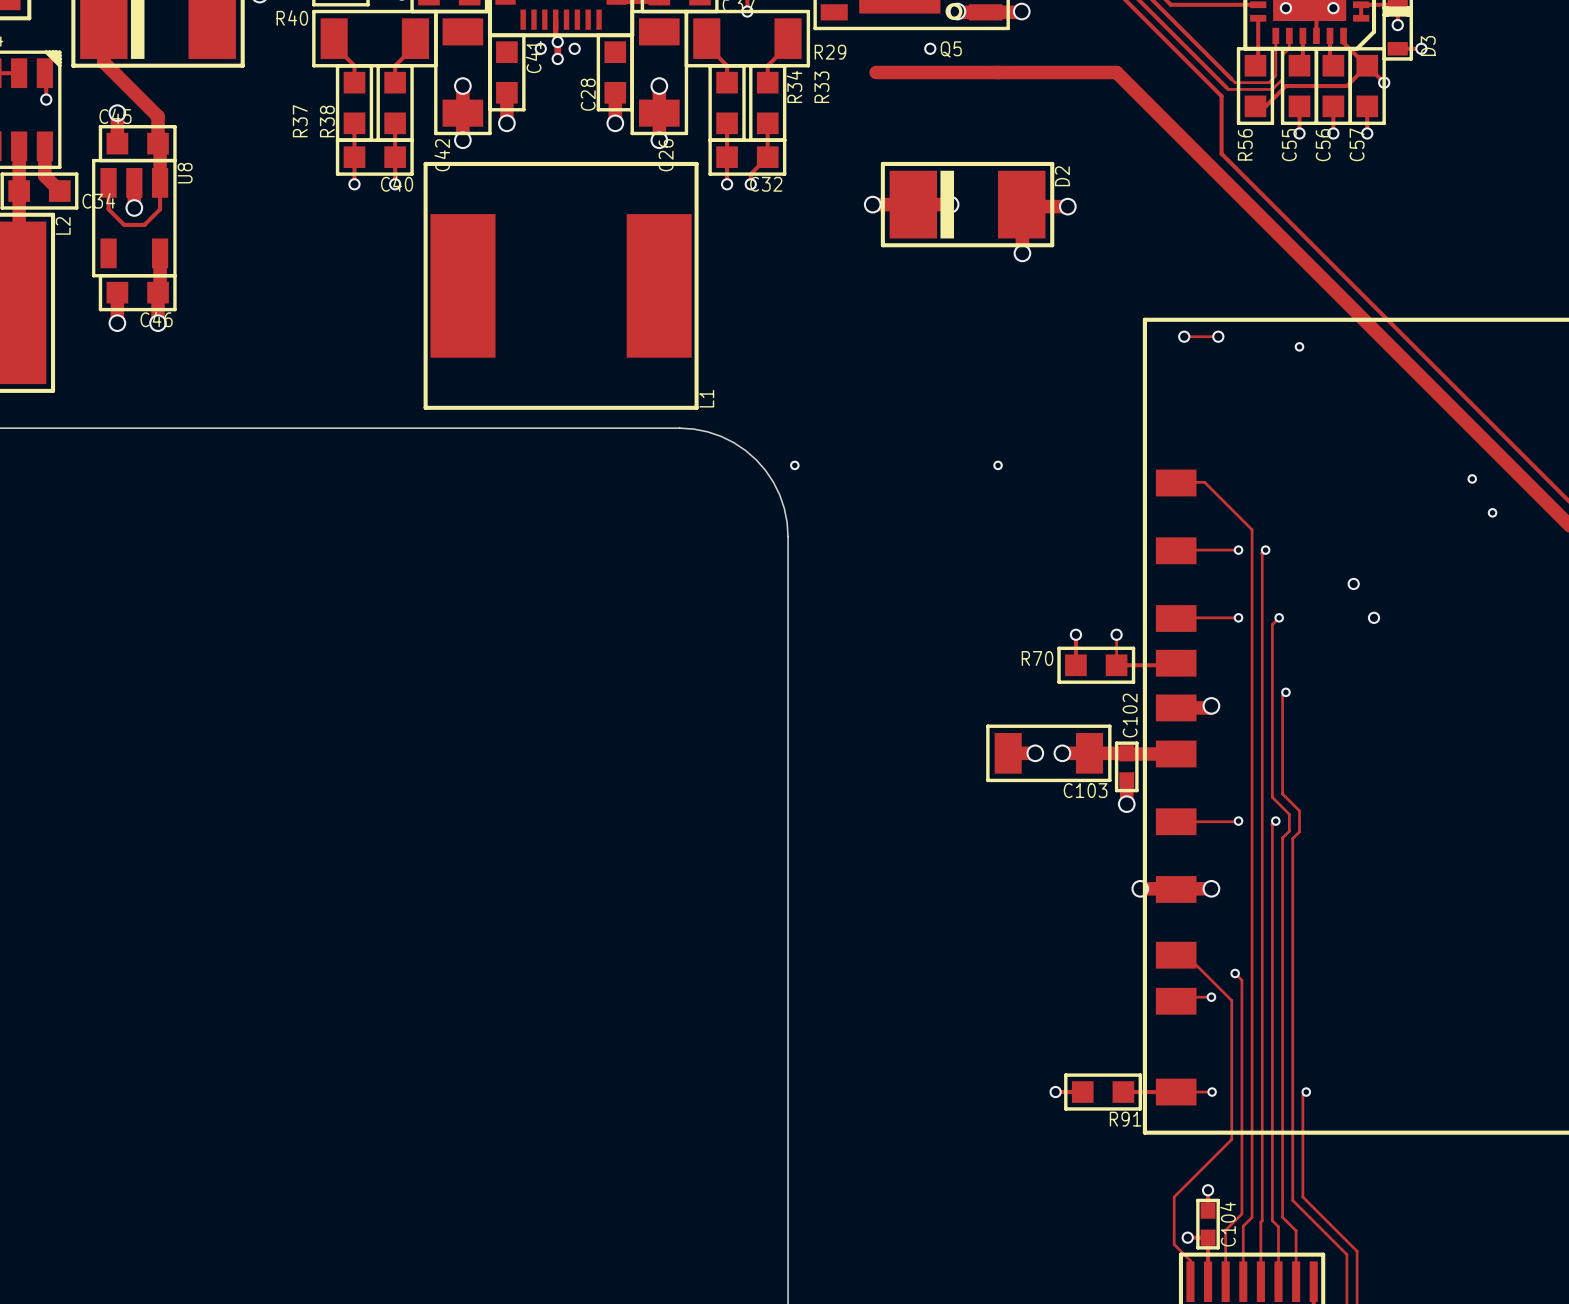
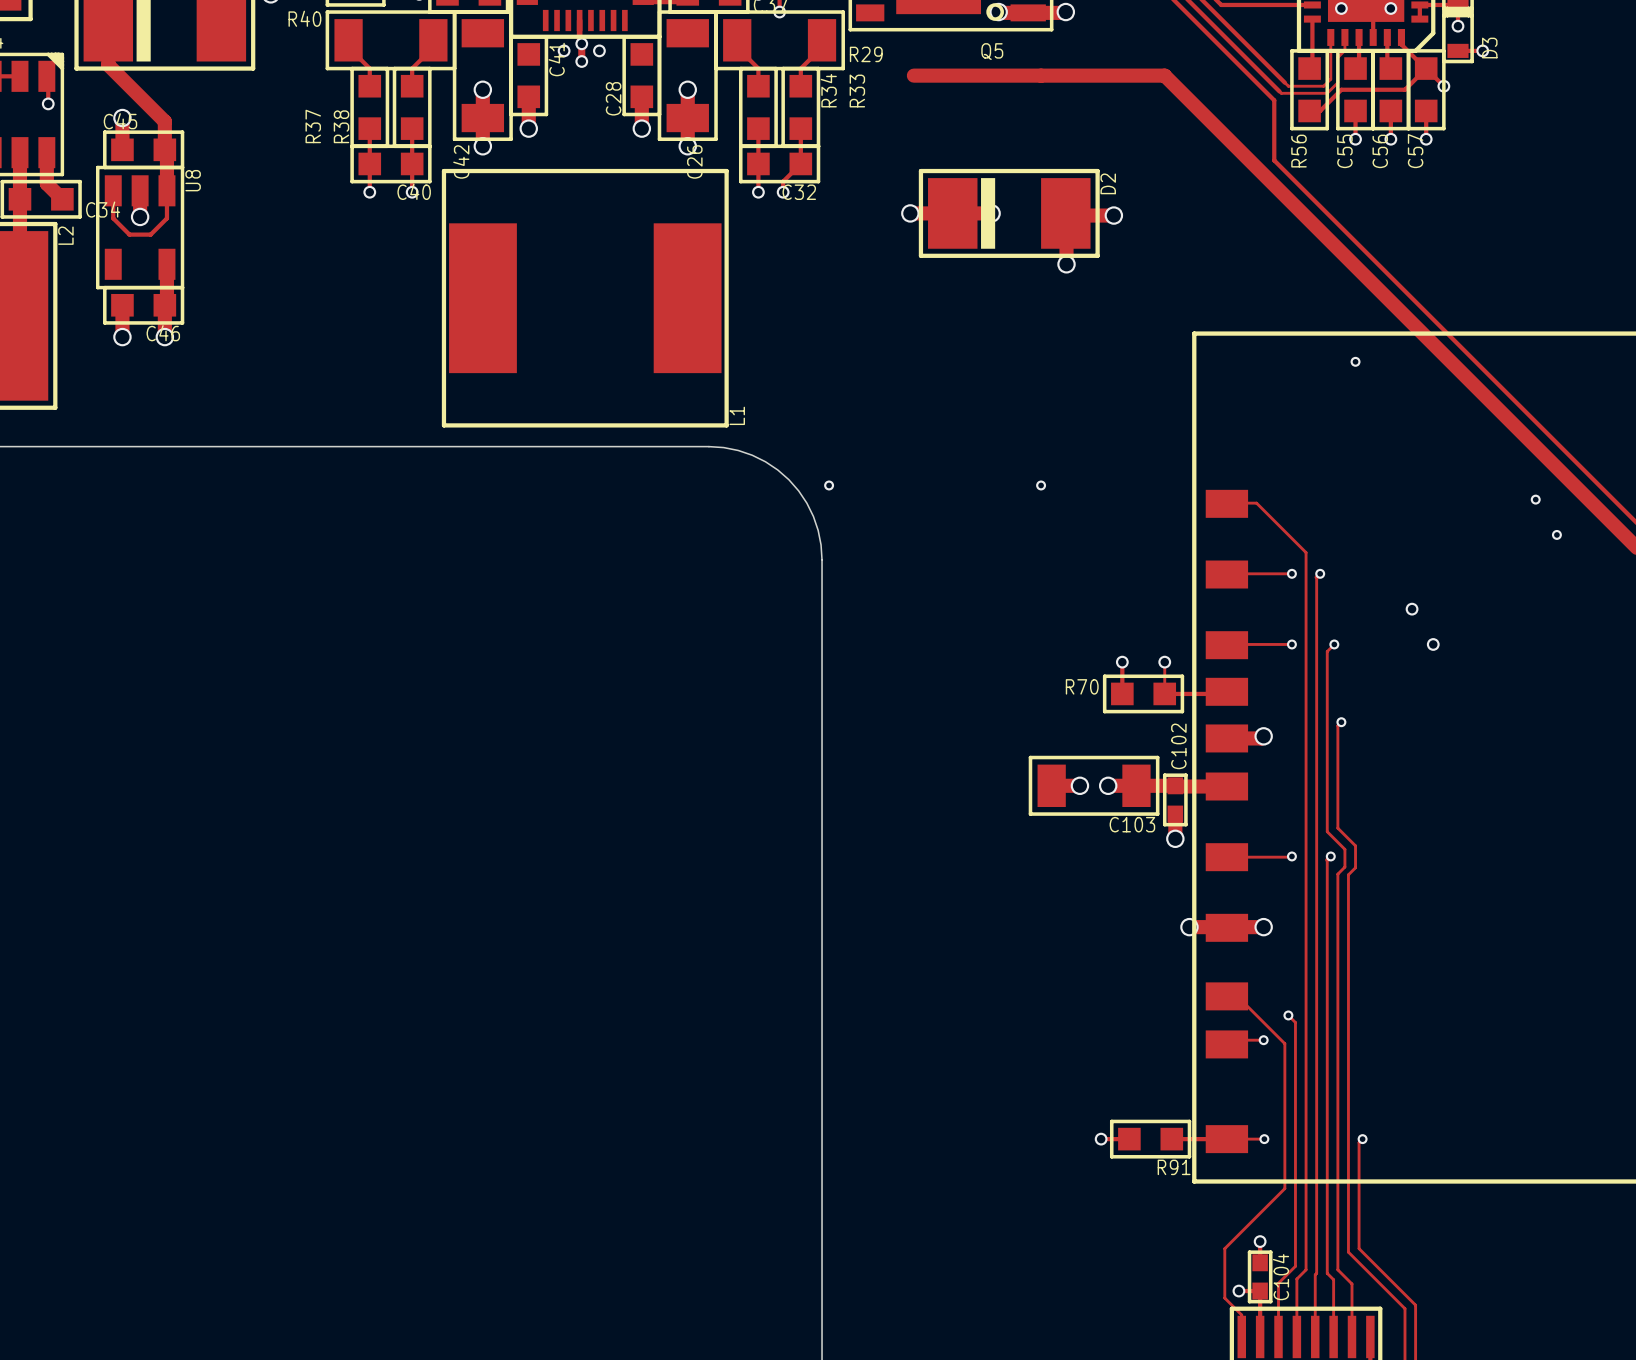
via: (930, 48) -> none
track: (1184, 336) (1218, 336) -> none
via: (1184, 336) -> none
via: (1218, 336) -> none

